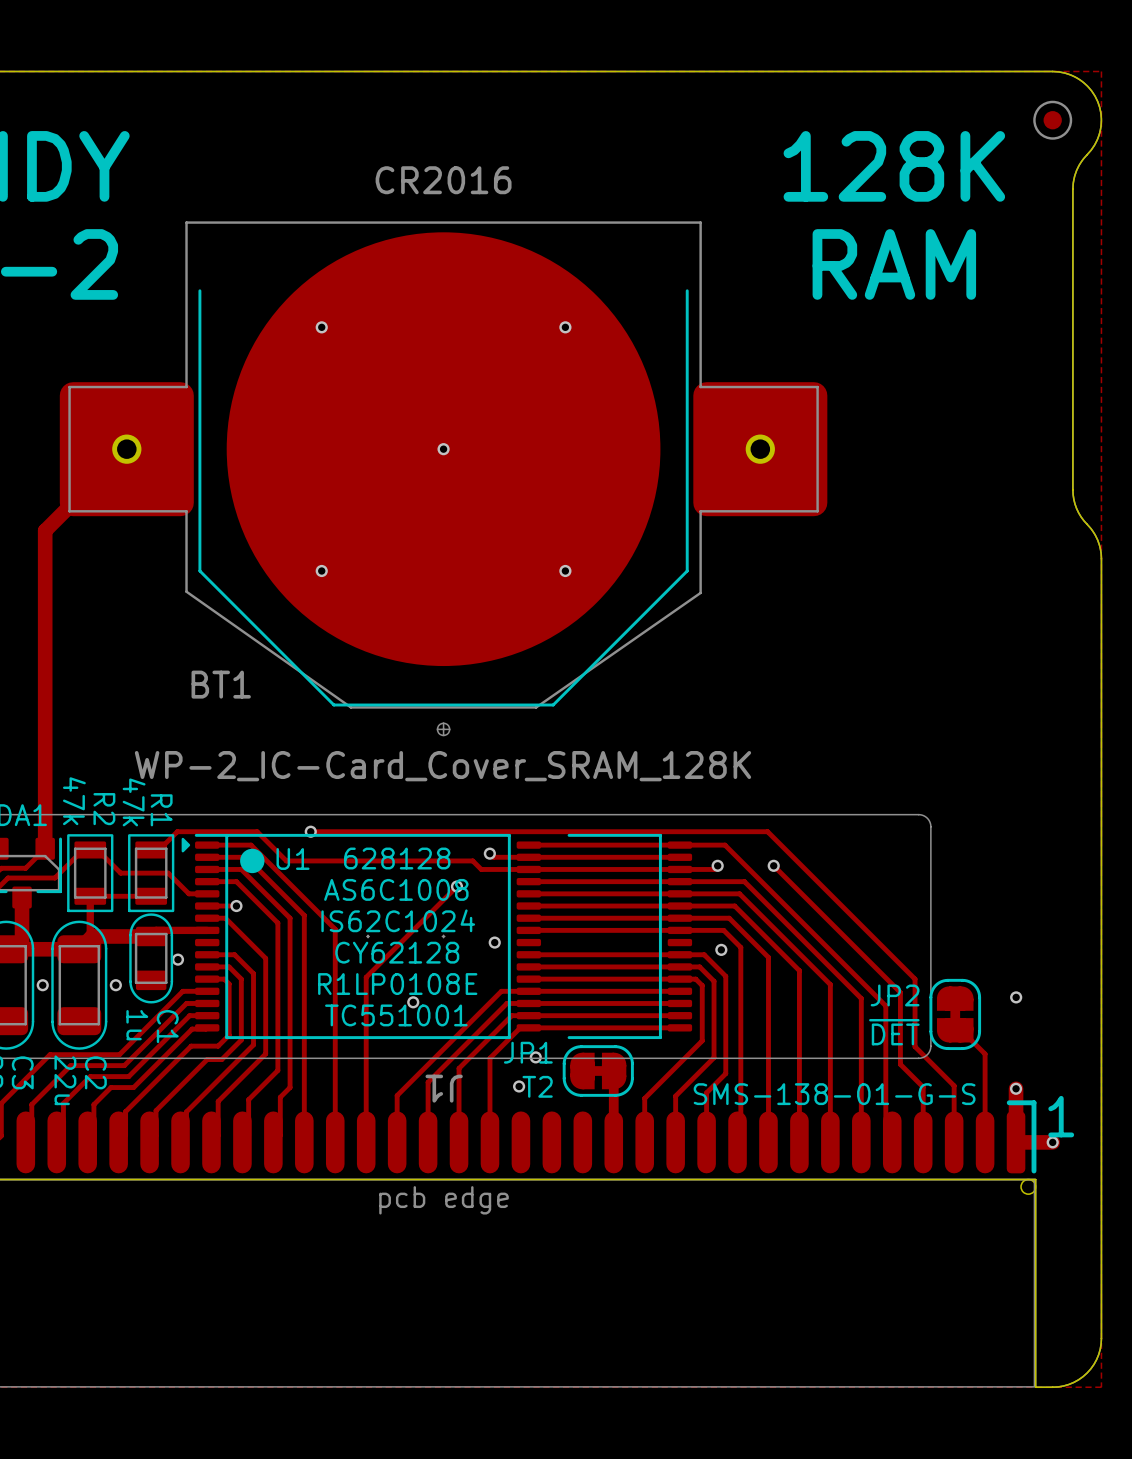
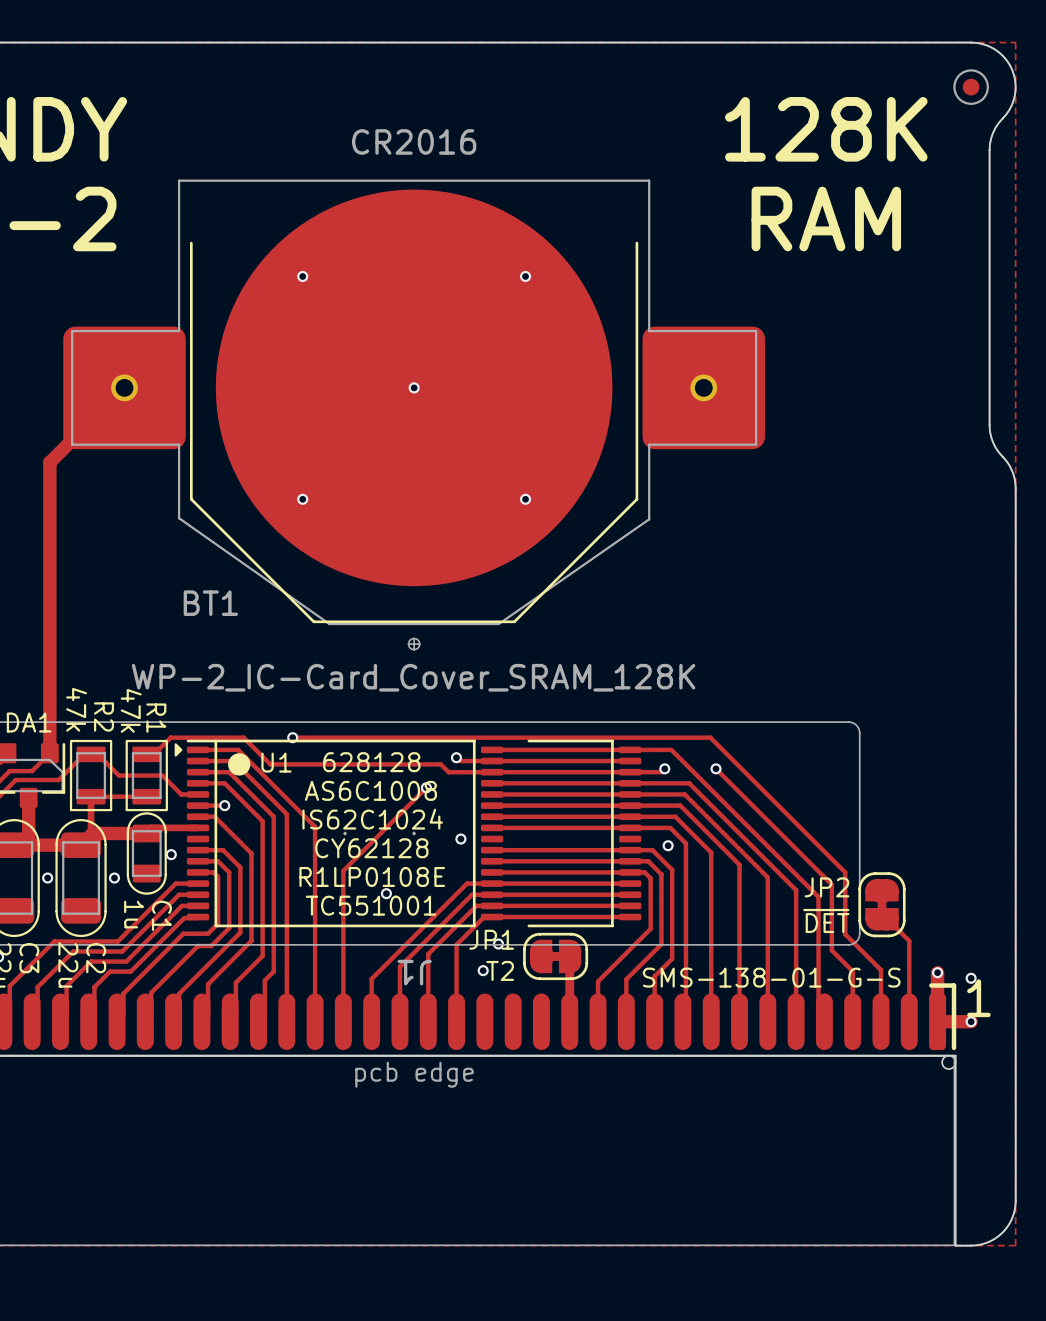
via position: (1016, 997) -> (971, 978)

